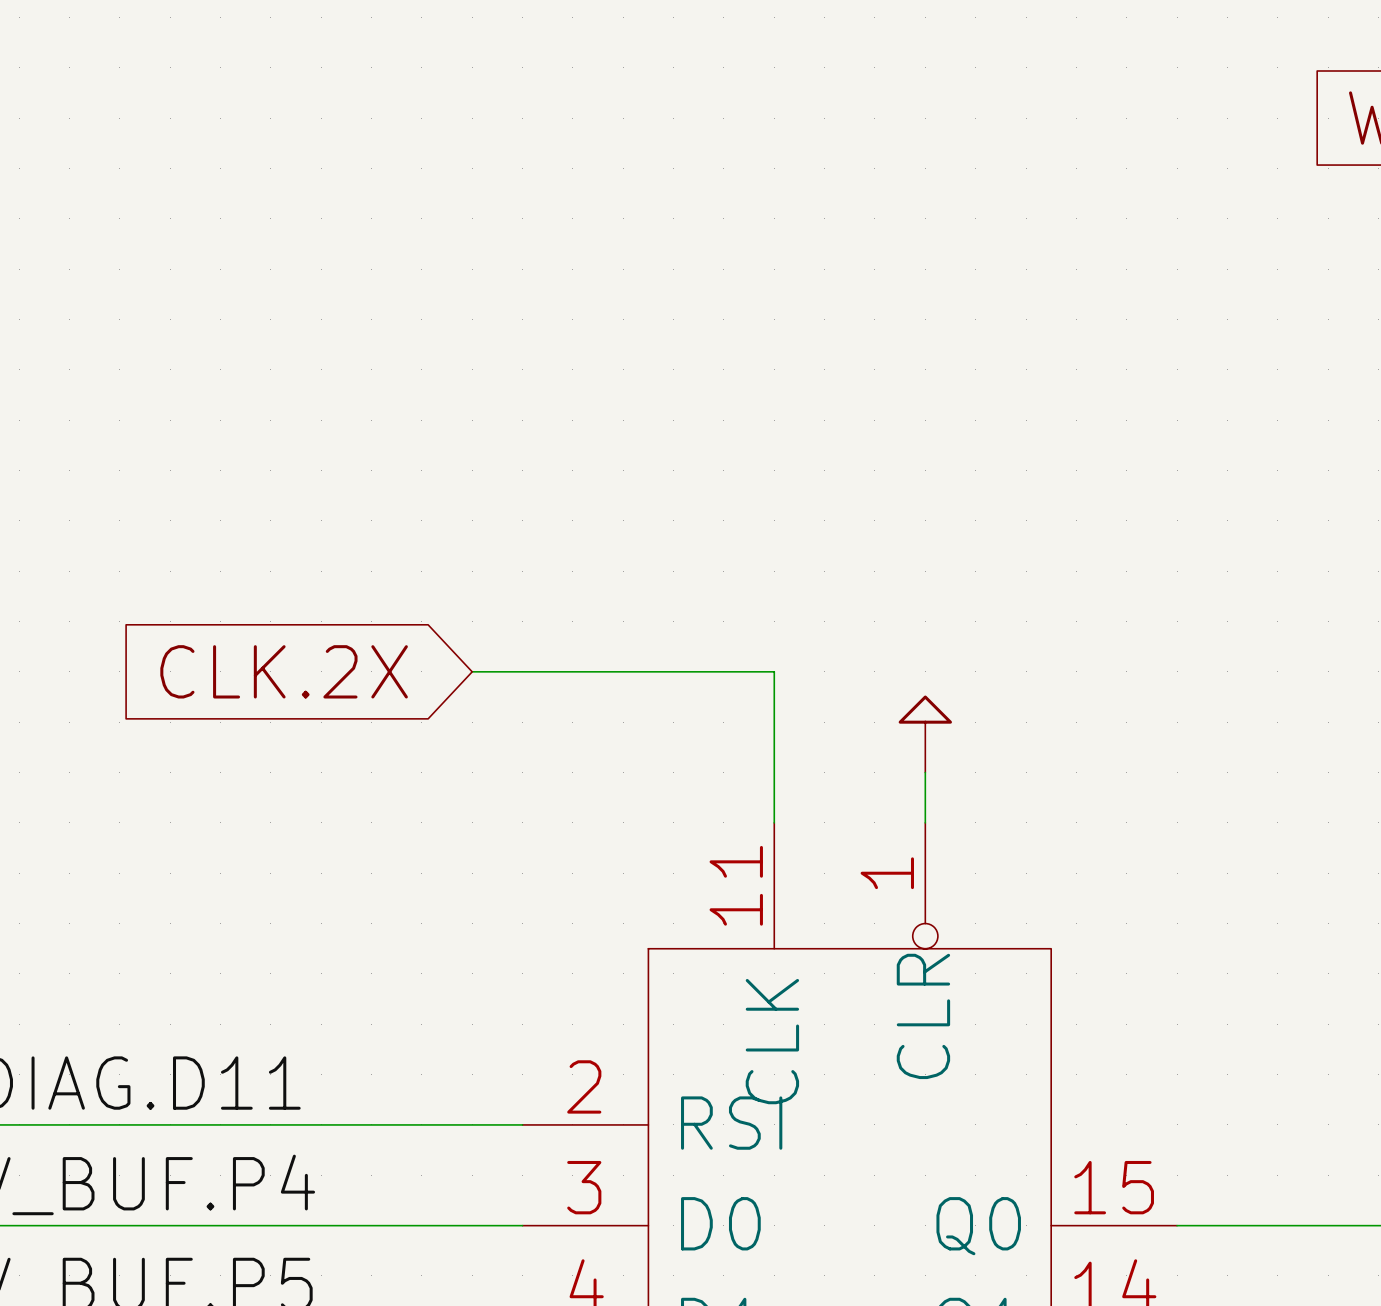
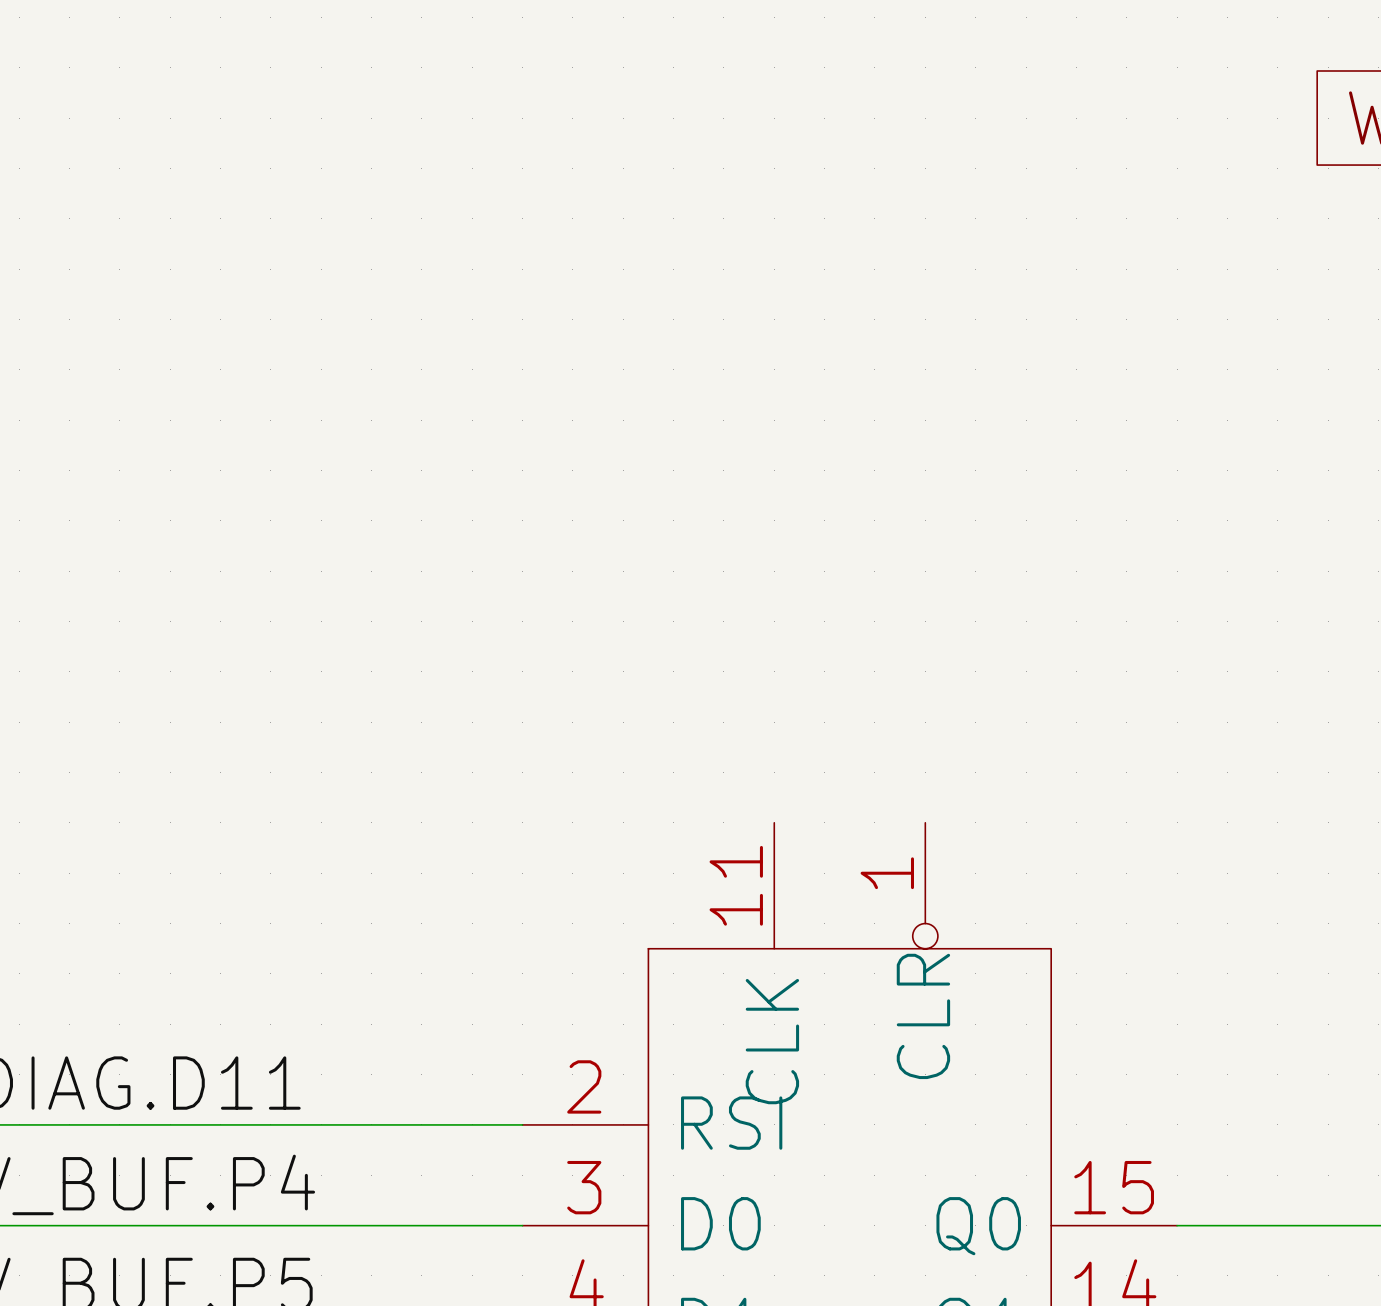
global label: CLK.2X (284, 671) -> none
wire: (472, 671) (774, 671) (774, 822) -> none
power symbol: (925, 734) -> none
wire: (925, 772) (925, 822) -> none

